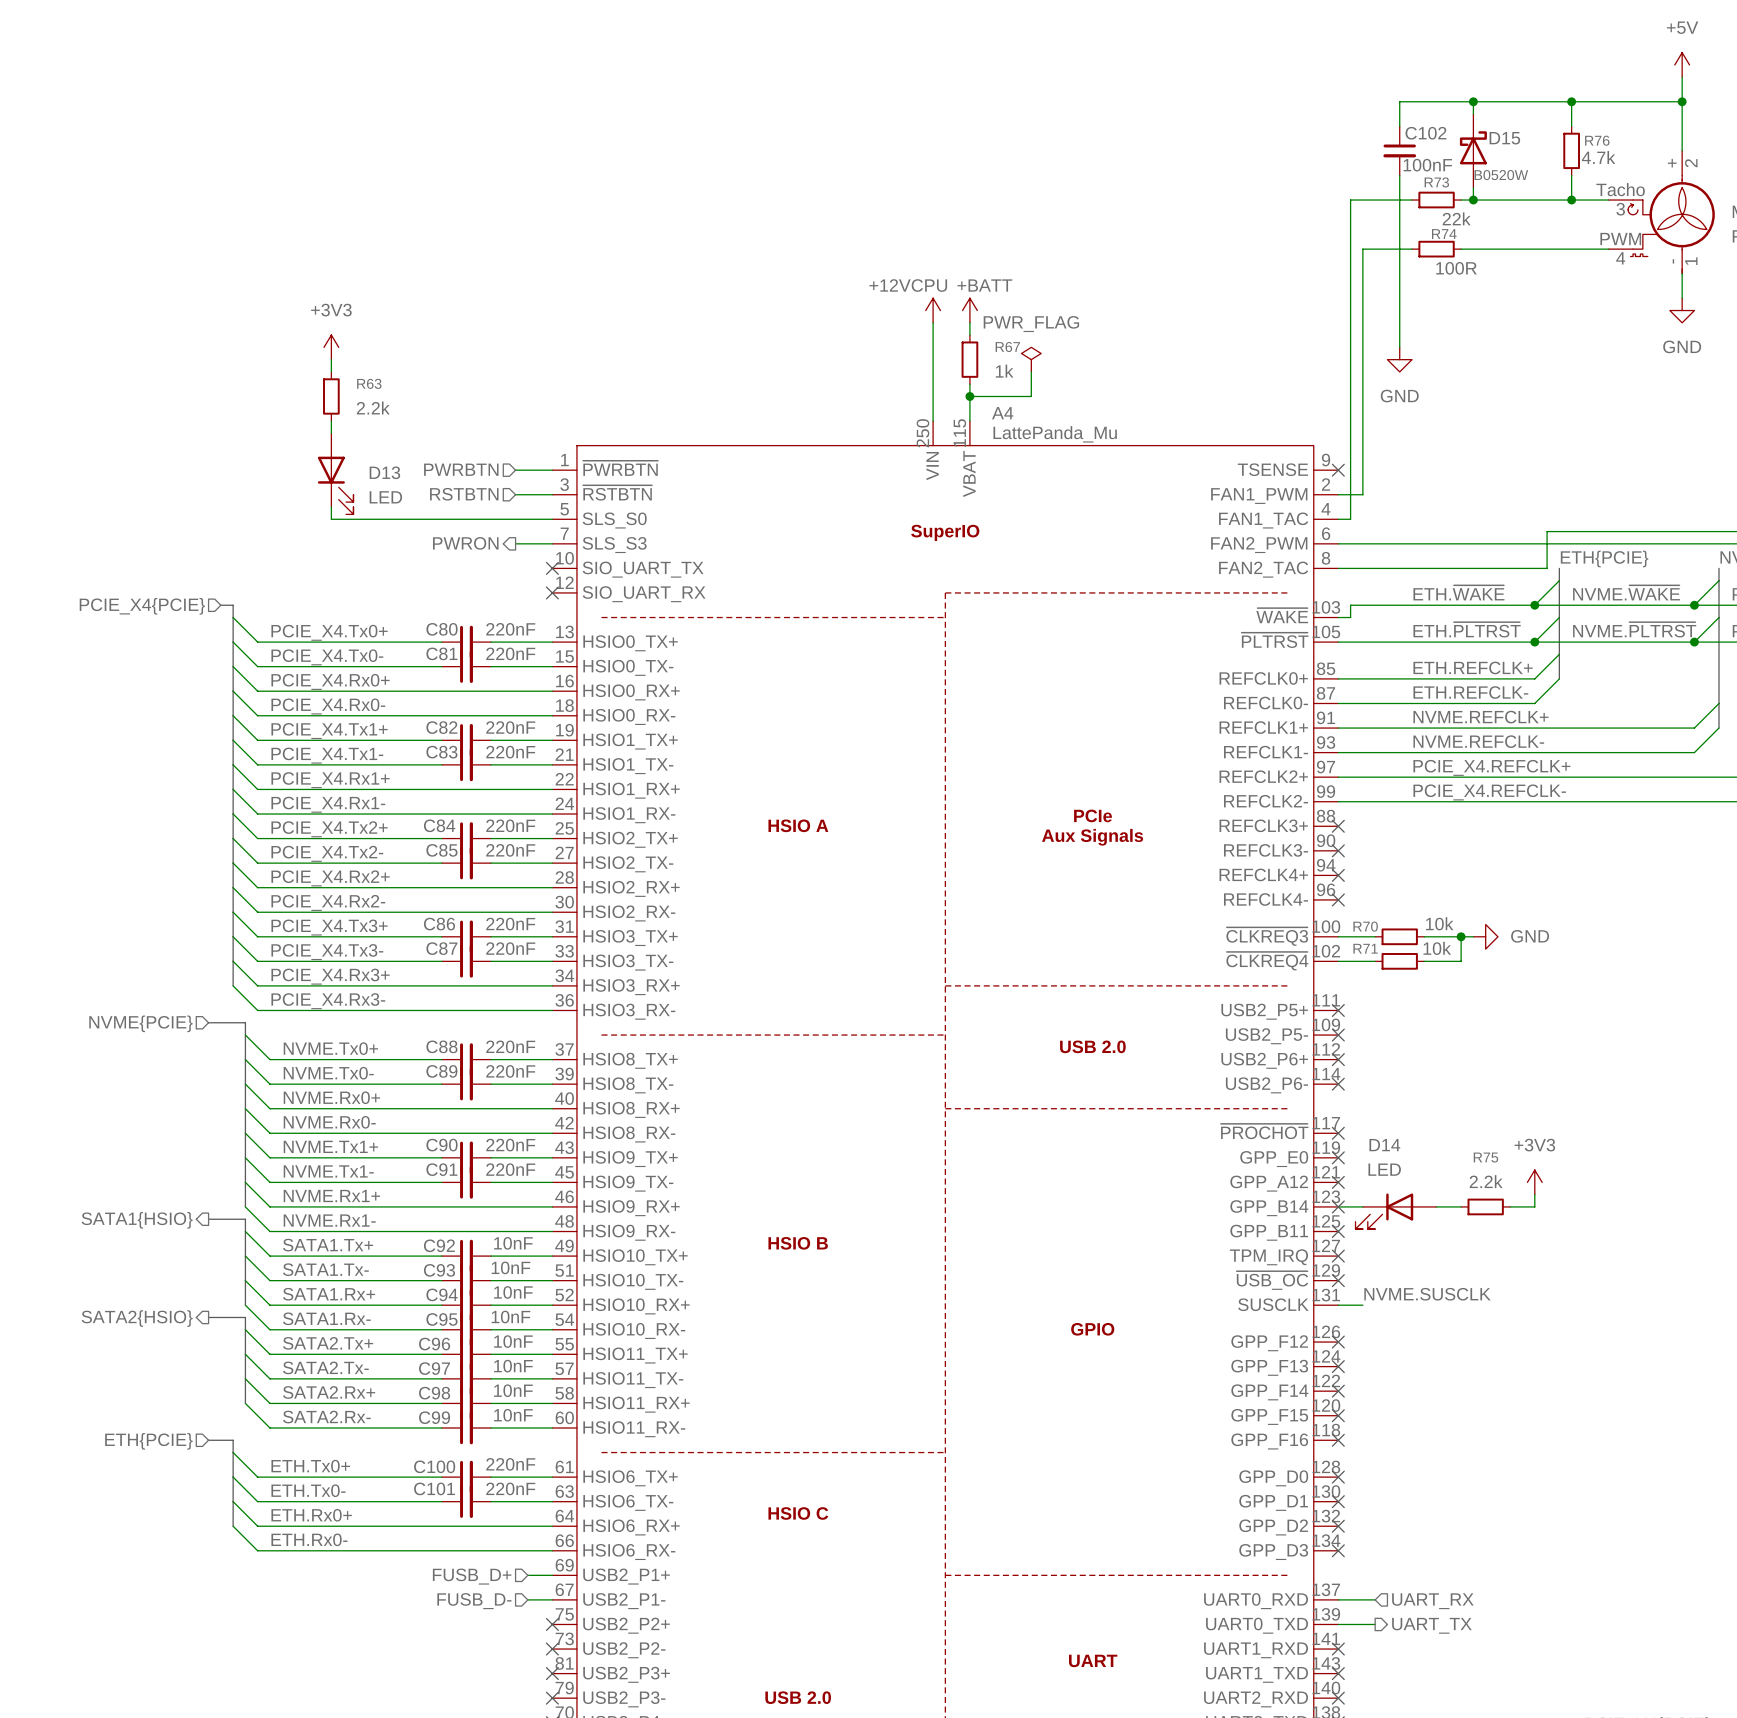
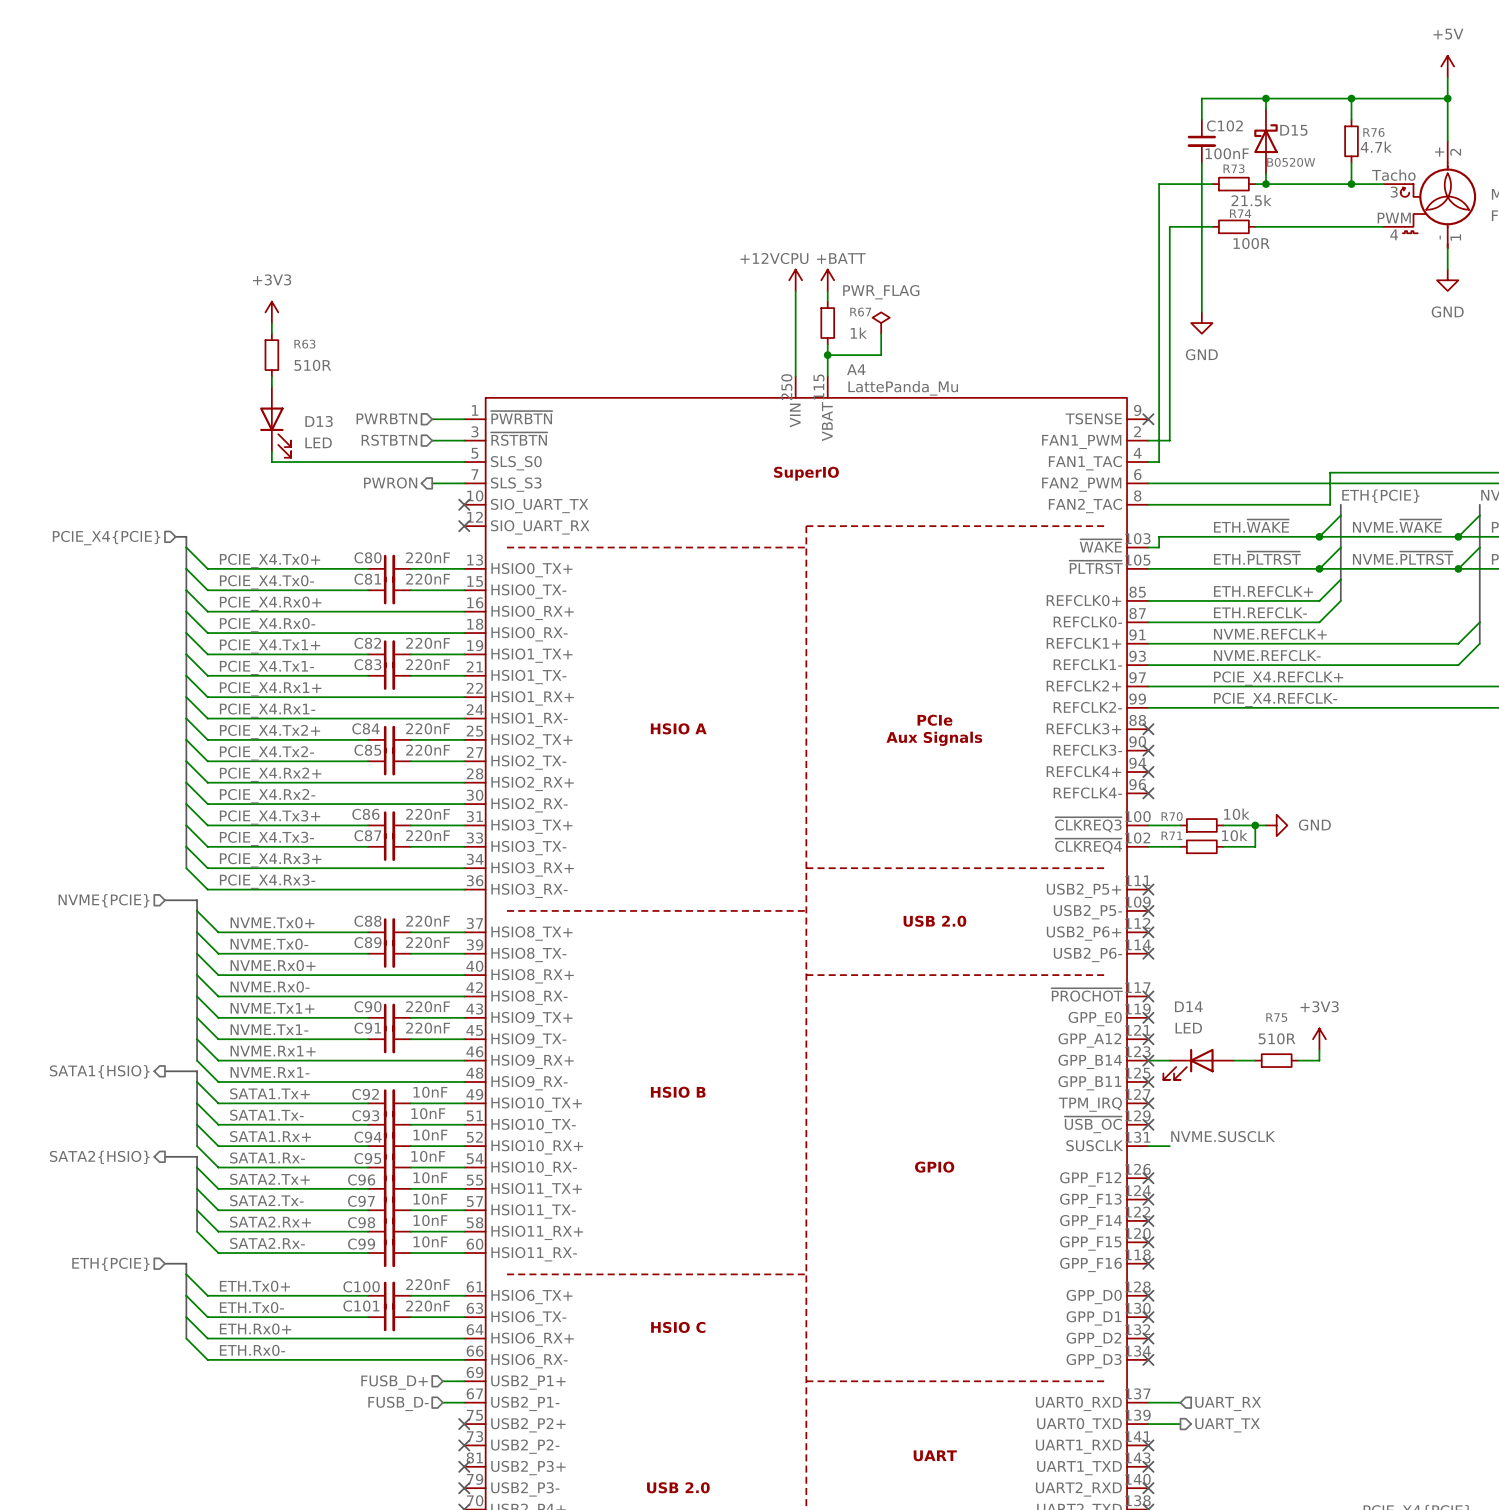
R73 value: 22k (1456, 218) -> 21.5k (1251, 200)
R63 value: 2.2k (373, 407) -> 510R (312, 365)
R75 value: 2.2k (1486, 1181) -> 510R (1277, 1038)

